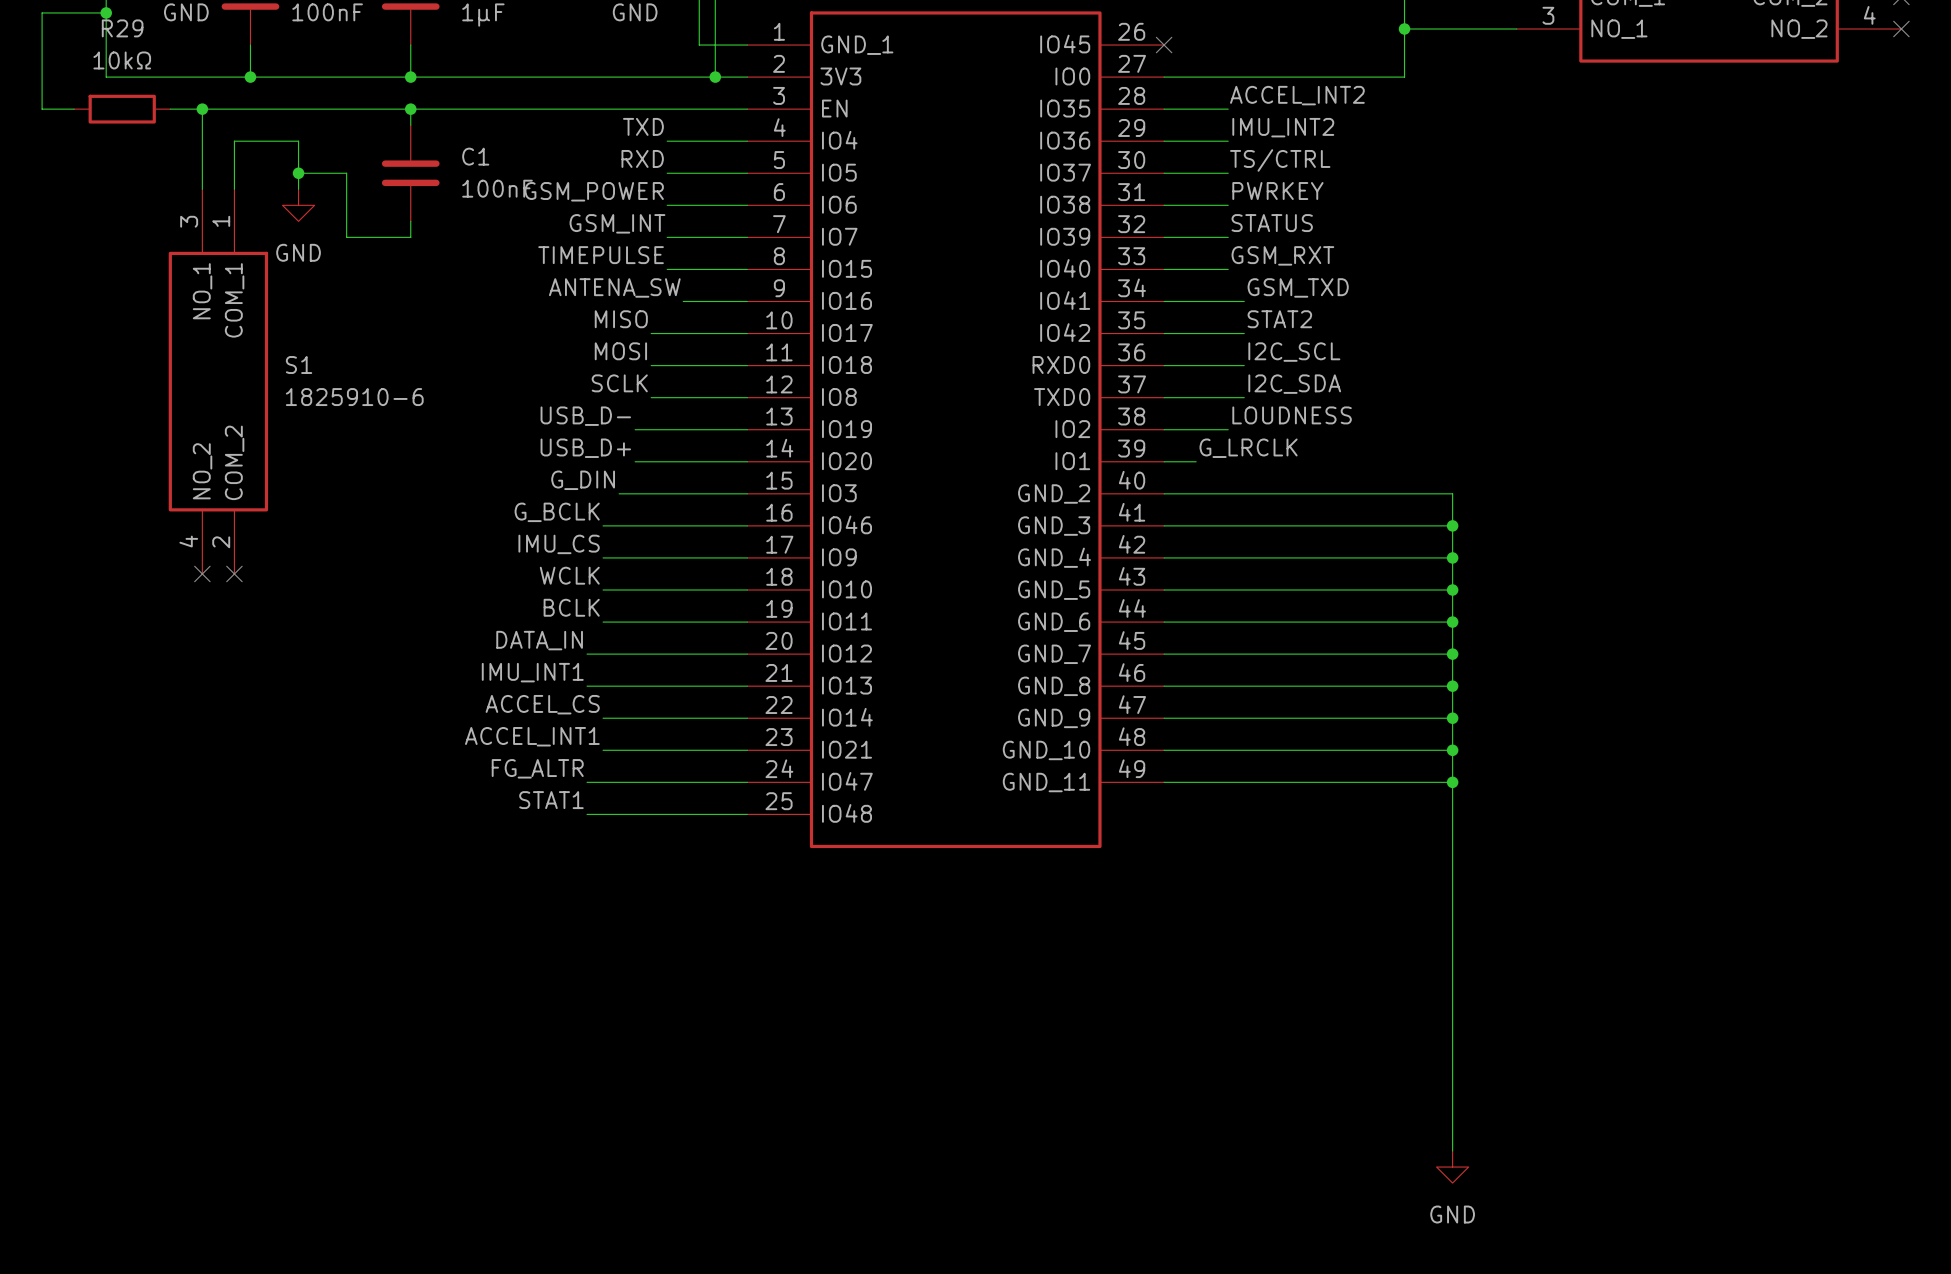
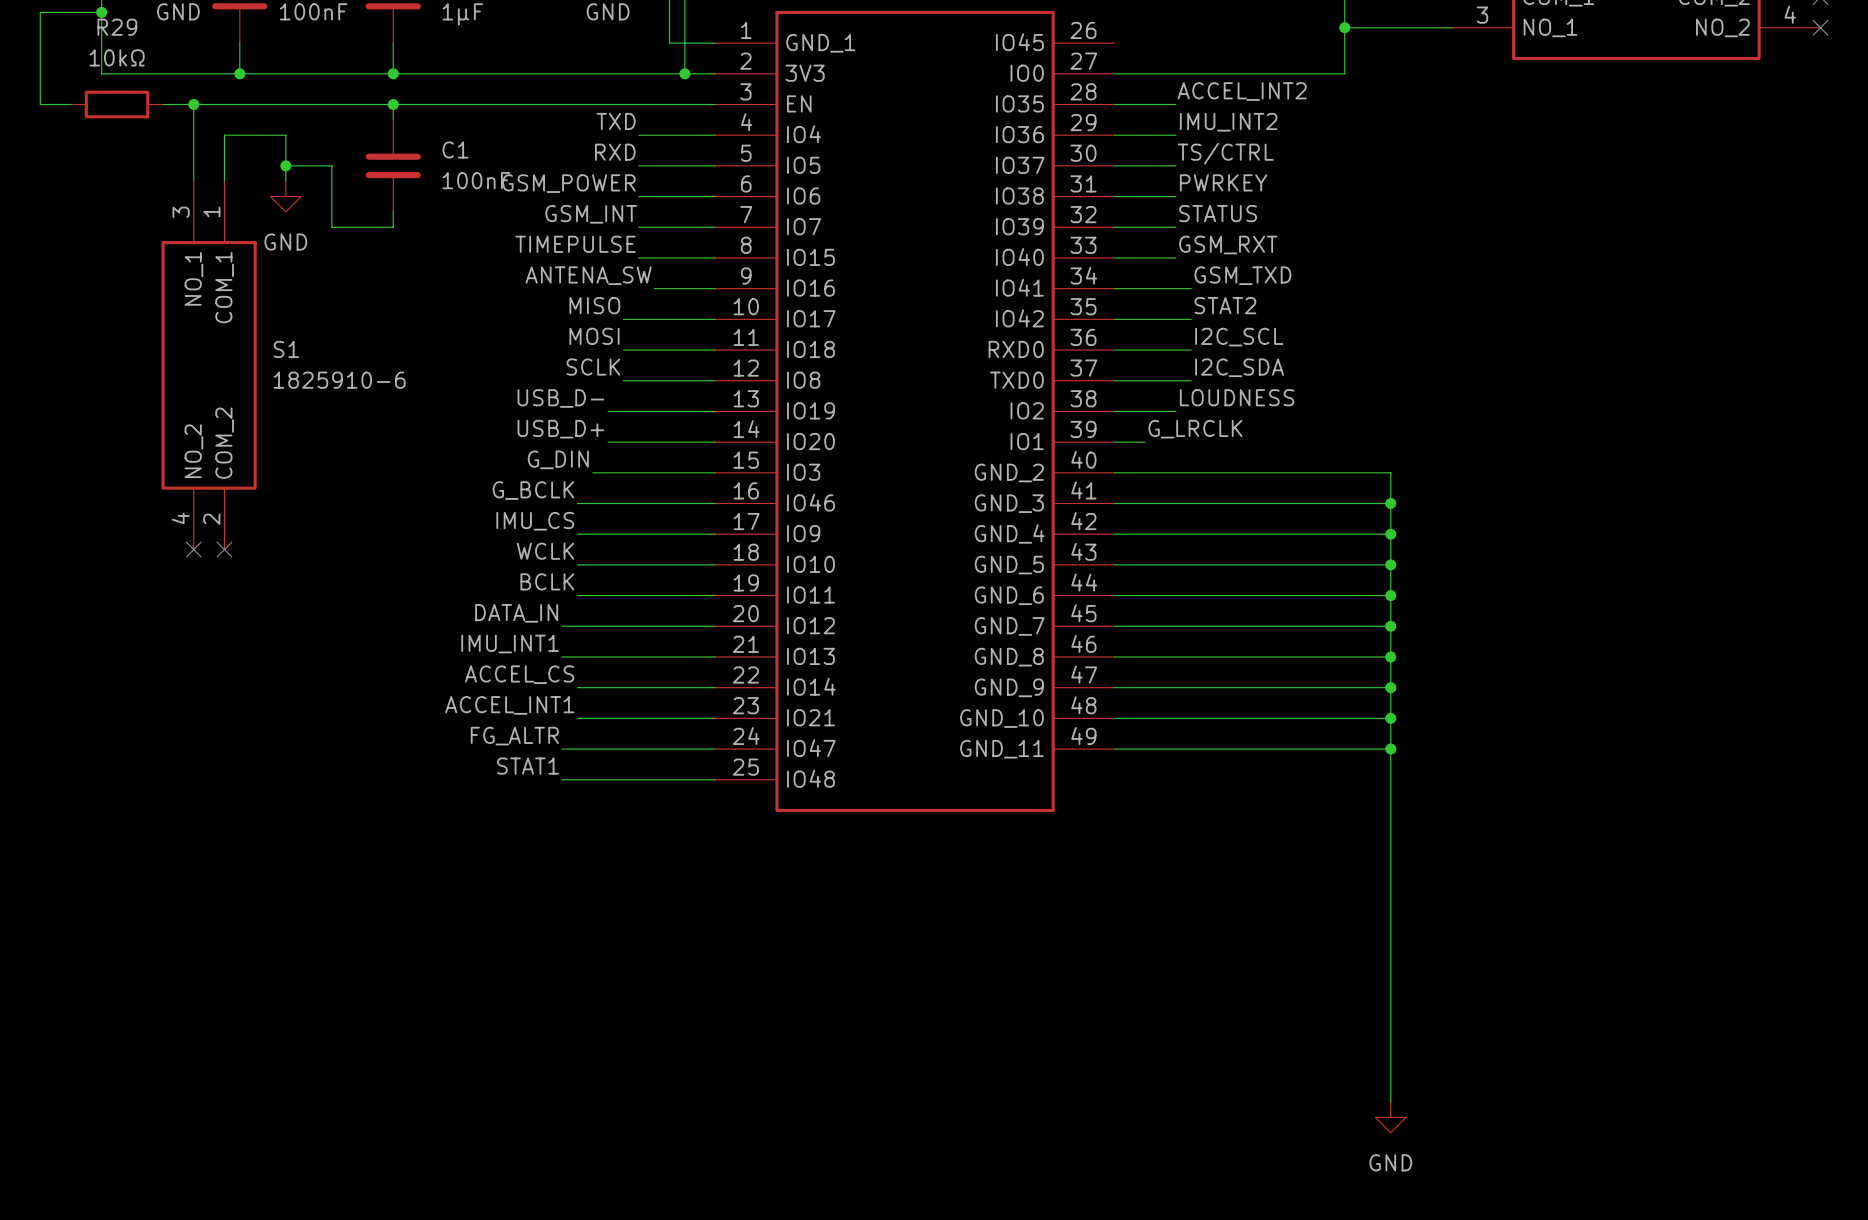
no-connect mark: (1164, 45) -> none

